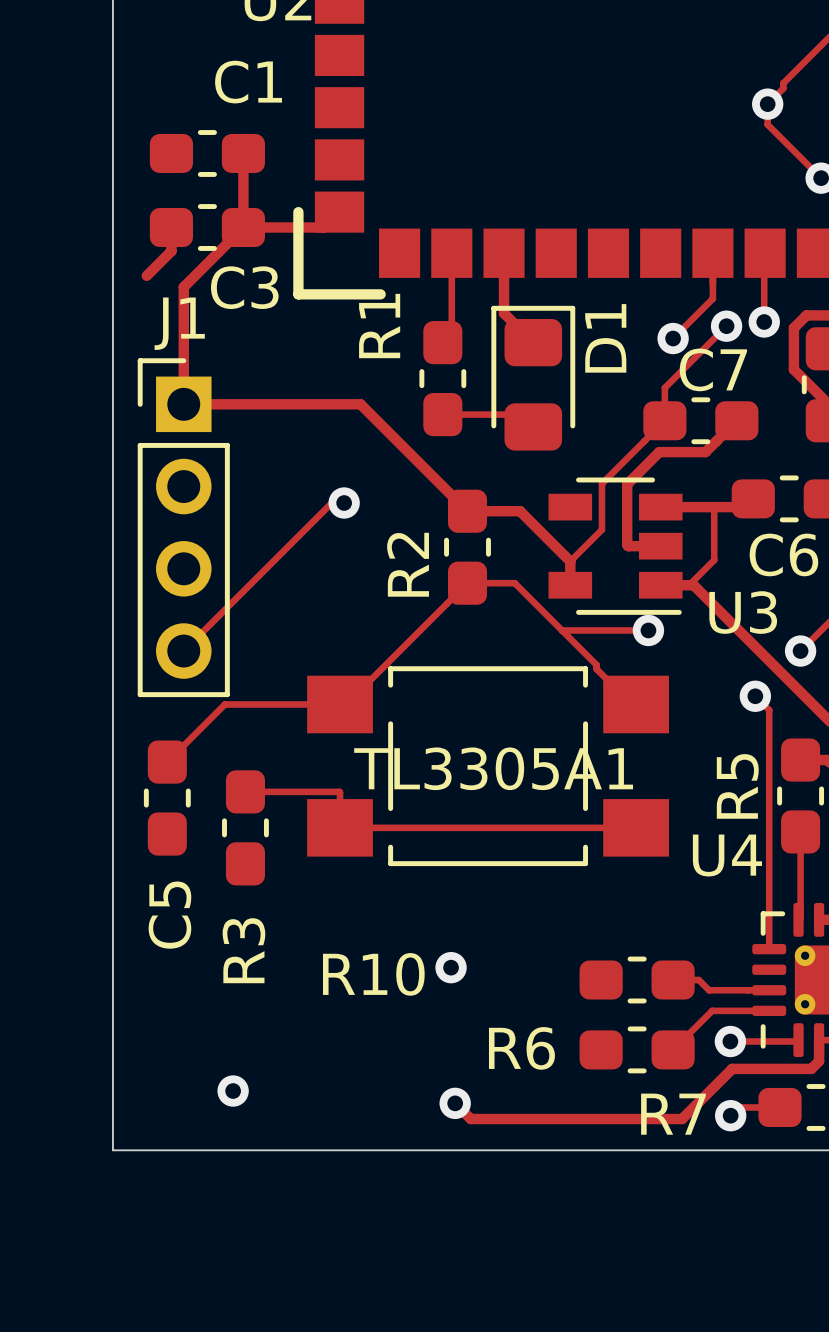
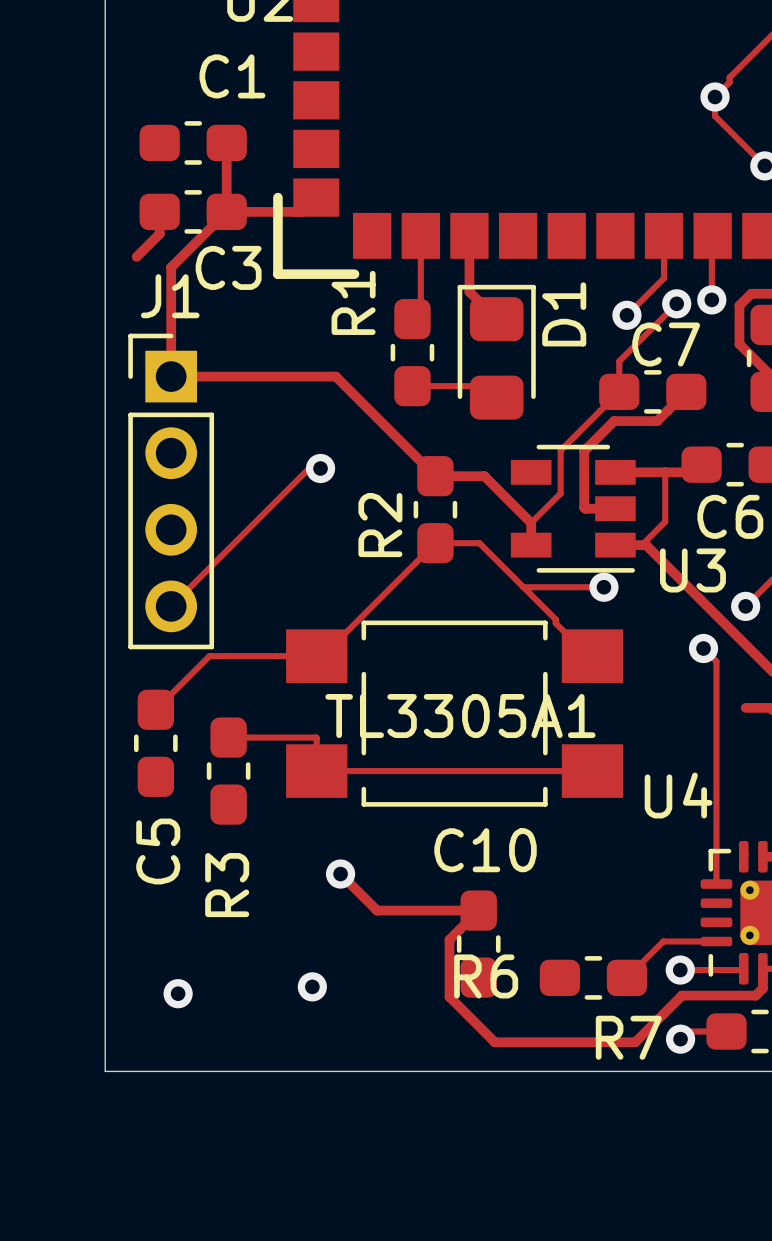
R5: (800, 795) -> none
track: (800, 831) (800, 917) -> none
via: none -> (340, 874)
via: (451, 967) -> none
R10: (637, 980) -> none
track: (673, 980) (698, 980) (709, 990) (769, 990) -> none
C10: none -> (478, 944)
via: none -> (312, 986)
via position: (233, 1091) -> (178, 993)
track: (455, 1103) (470, 1119) (531, 1119) -> (340, 874) (377, 910) (478, 910) (449, 939) (449, 996) (494, 1042)
via: (455, 1103) -> none

